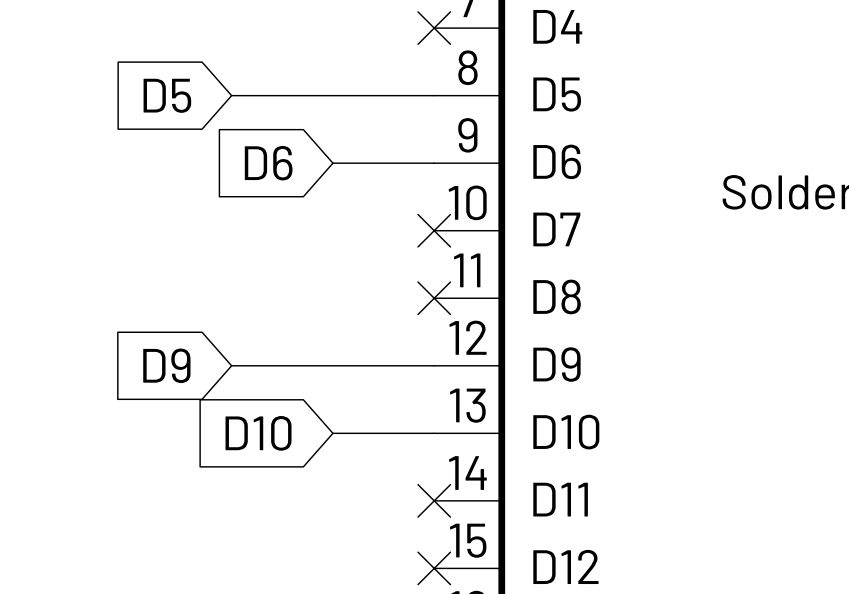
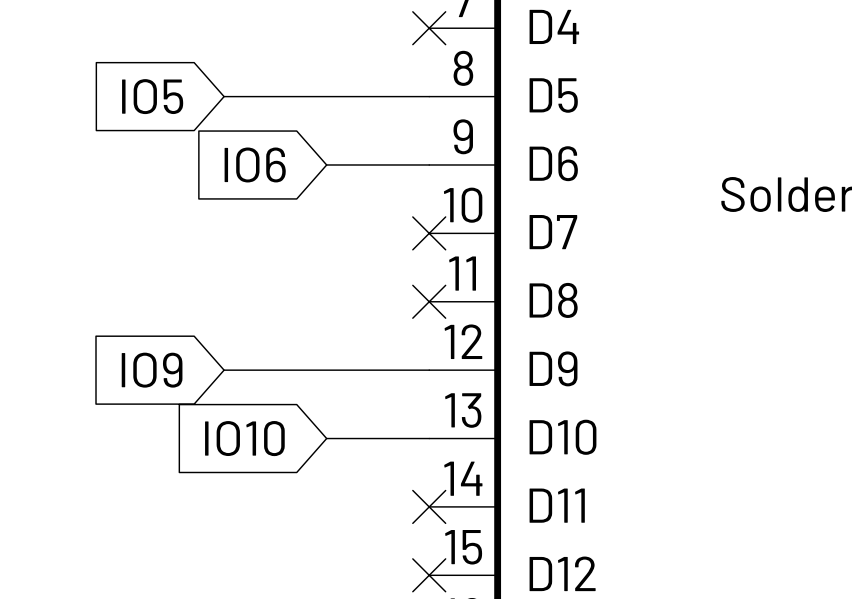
global label: D5 (167, 95) -> IO5 (152, 96)
global label: D6 (268, 163) -> IO6 (255, 164)
global label: D9 (166, 365) -> IO9 (152, 370)
global label: D10 (258, 433) -> IO10 (244, 438)

